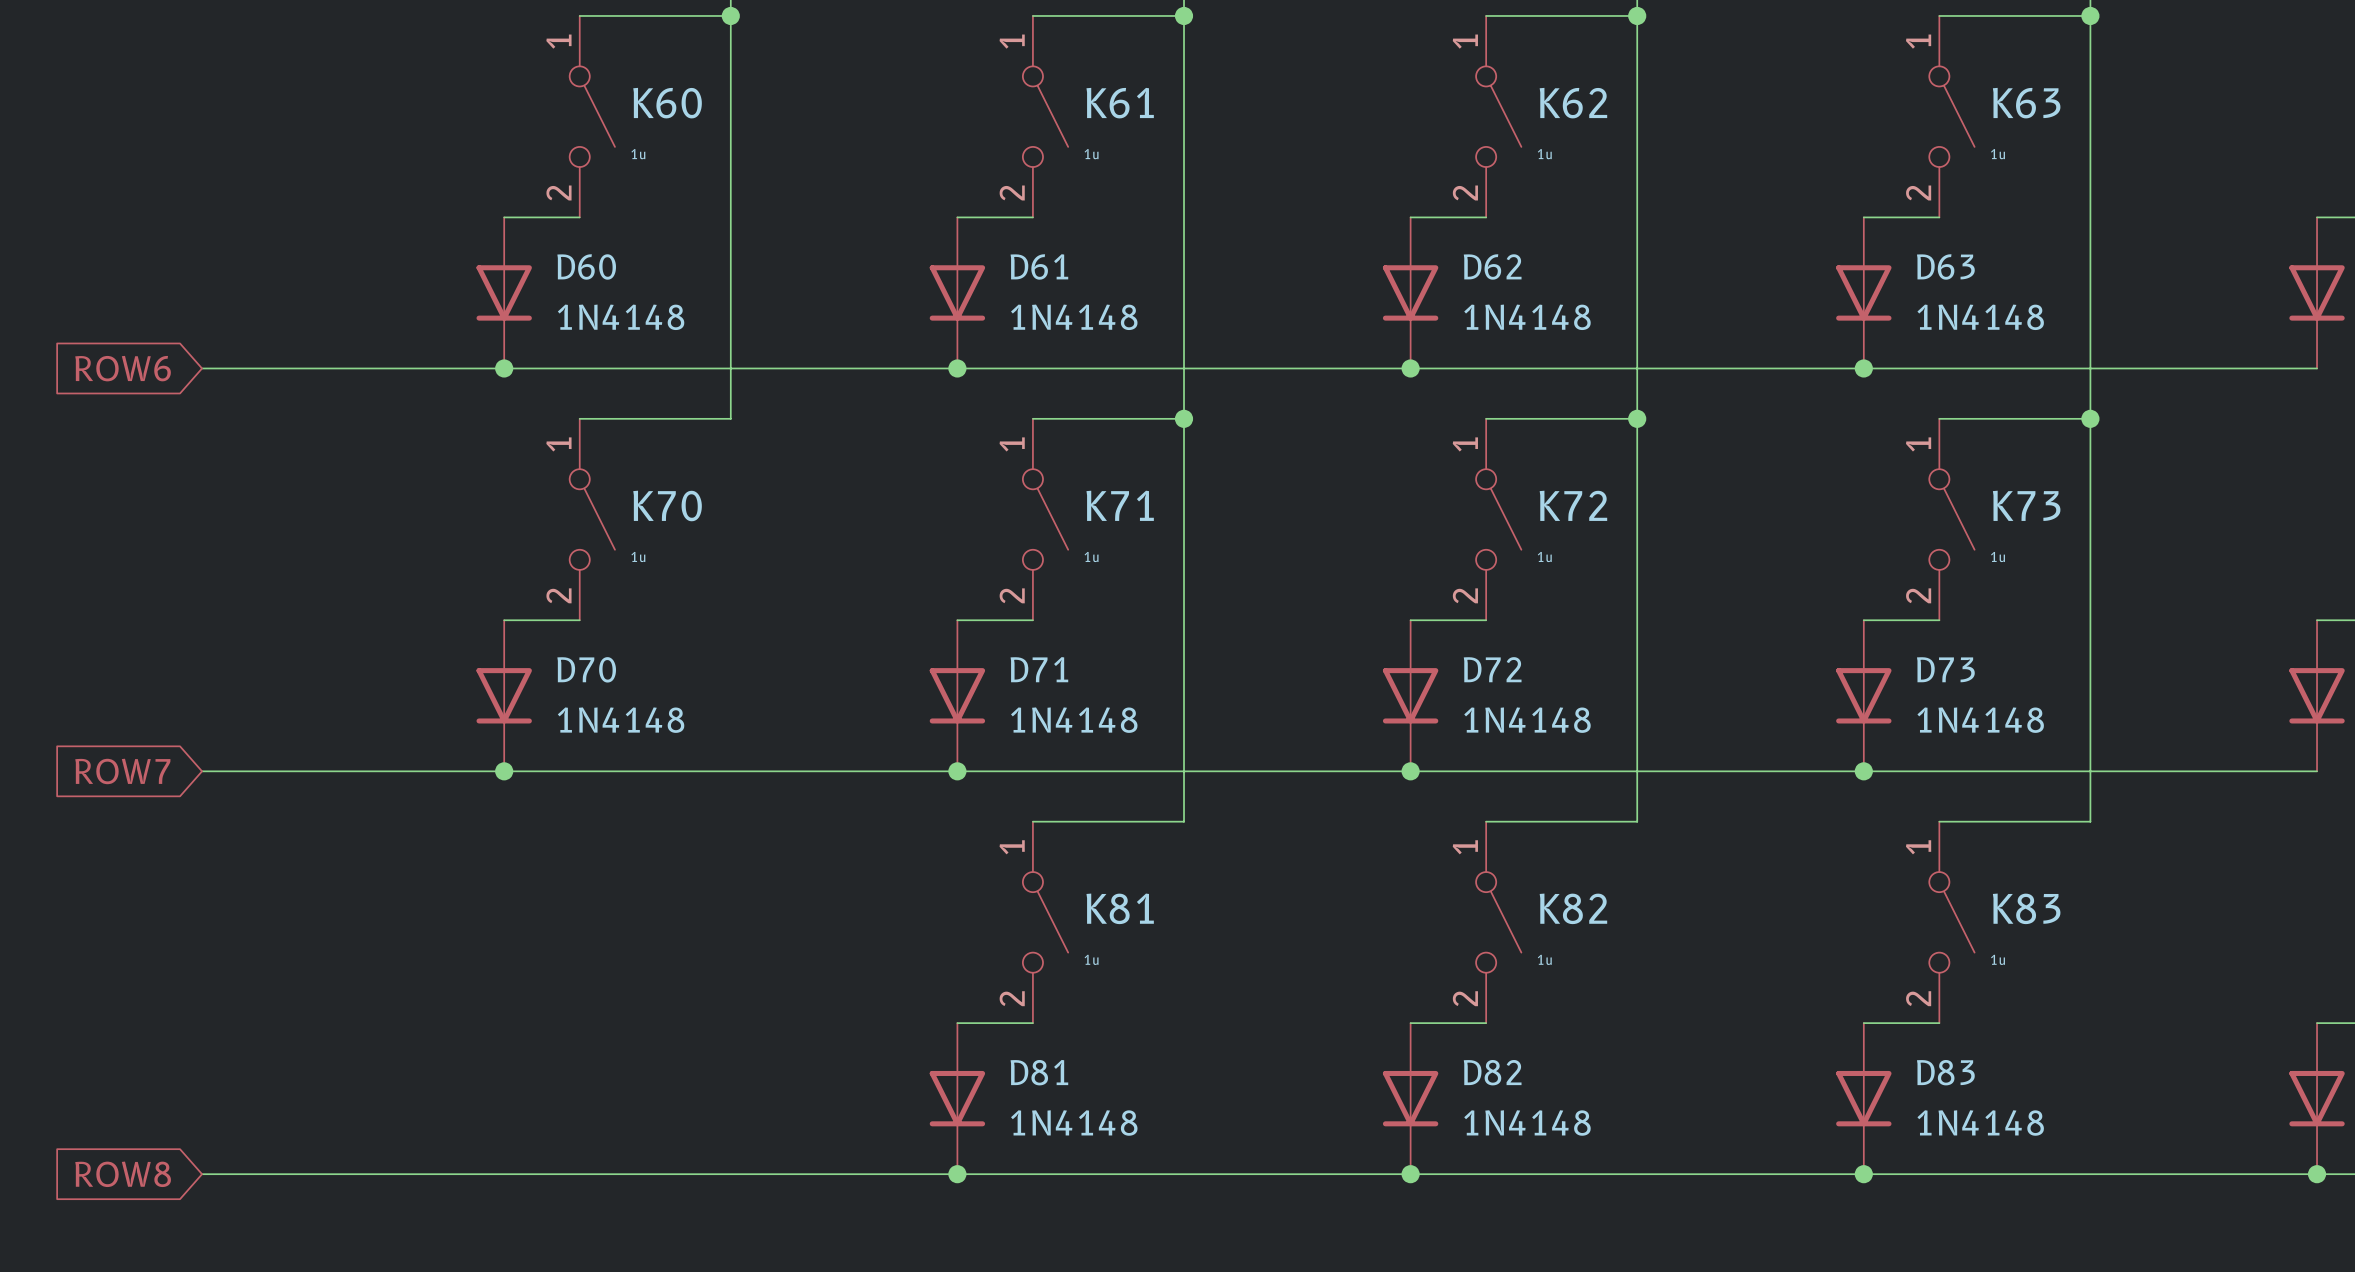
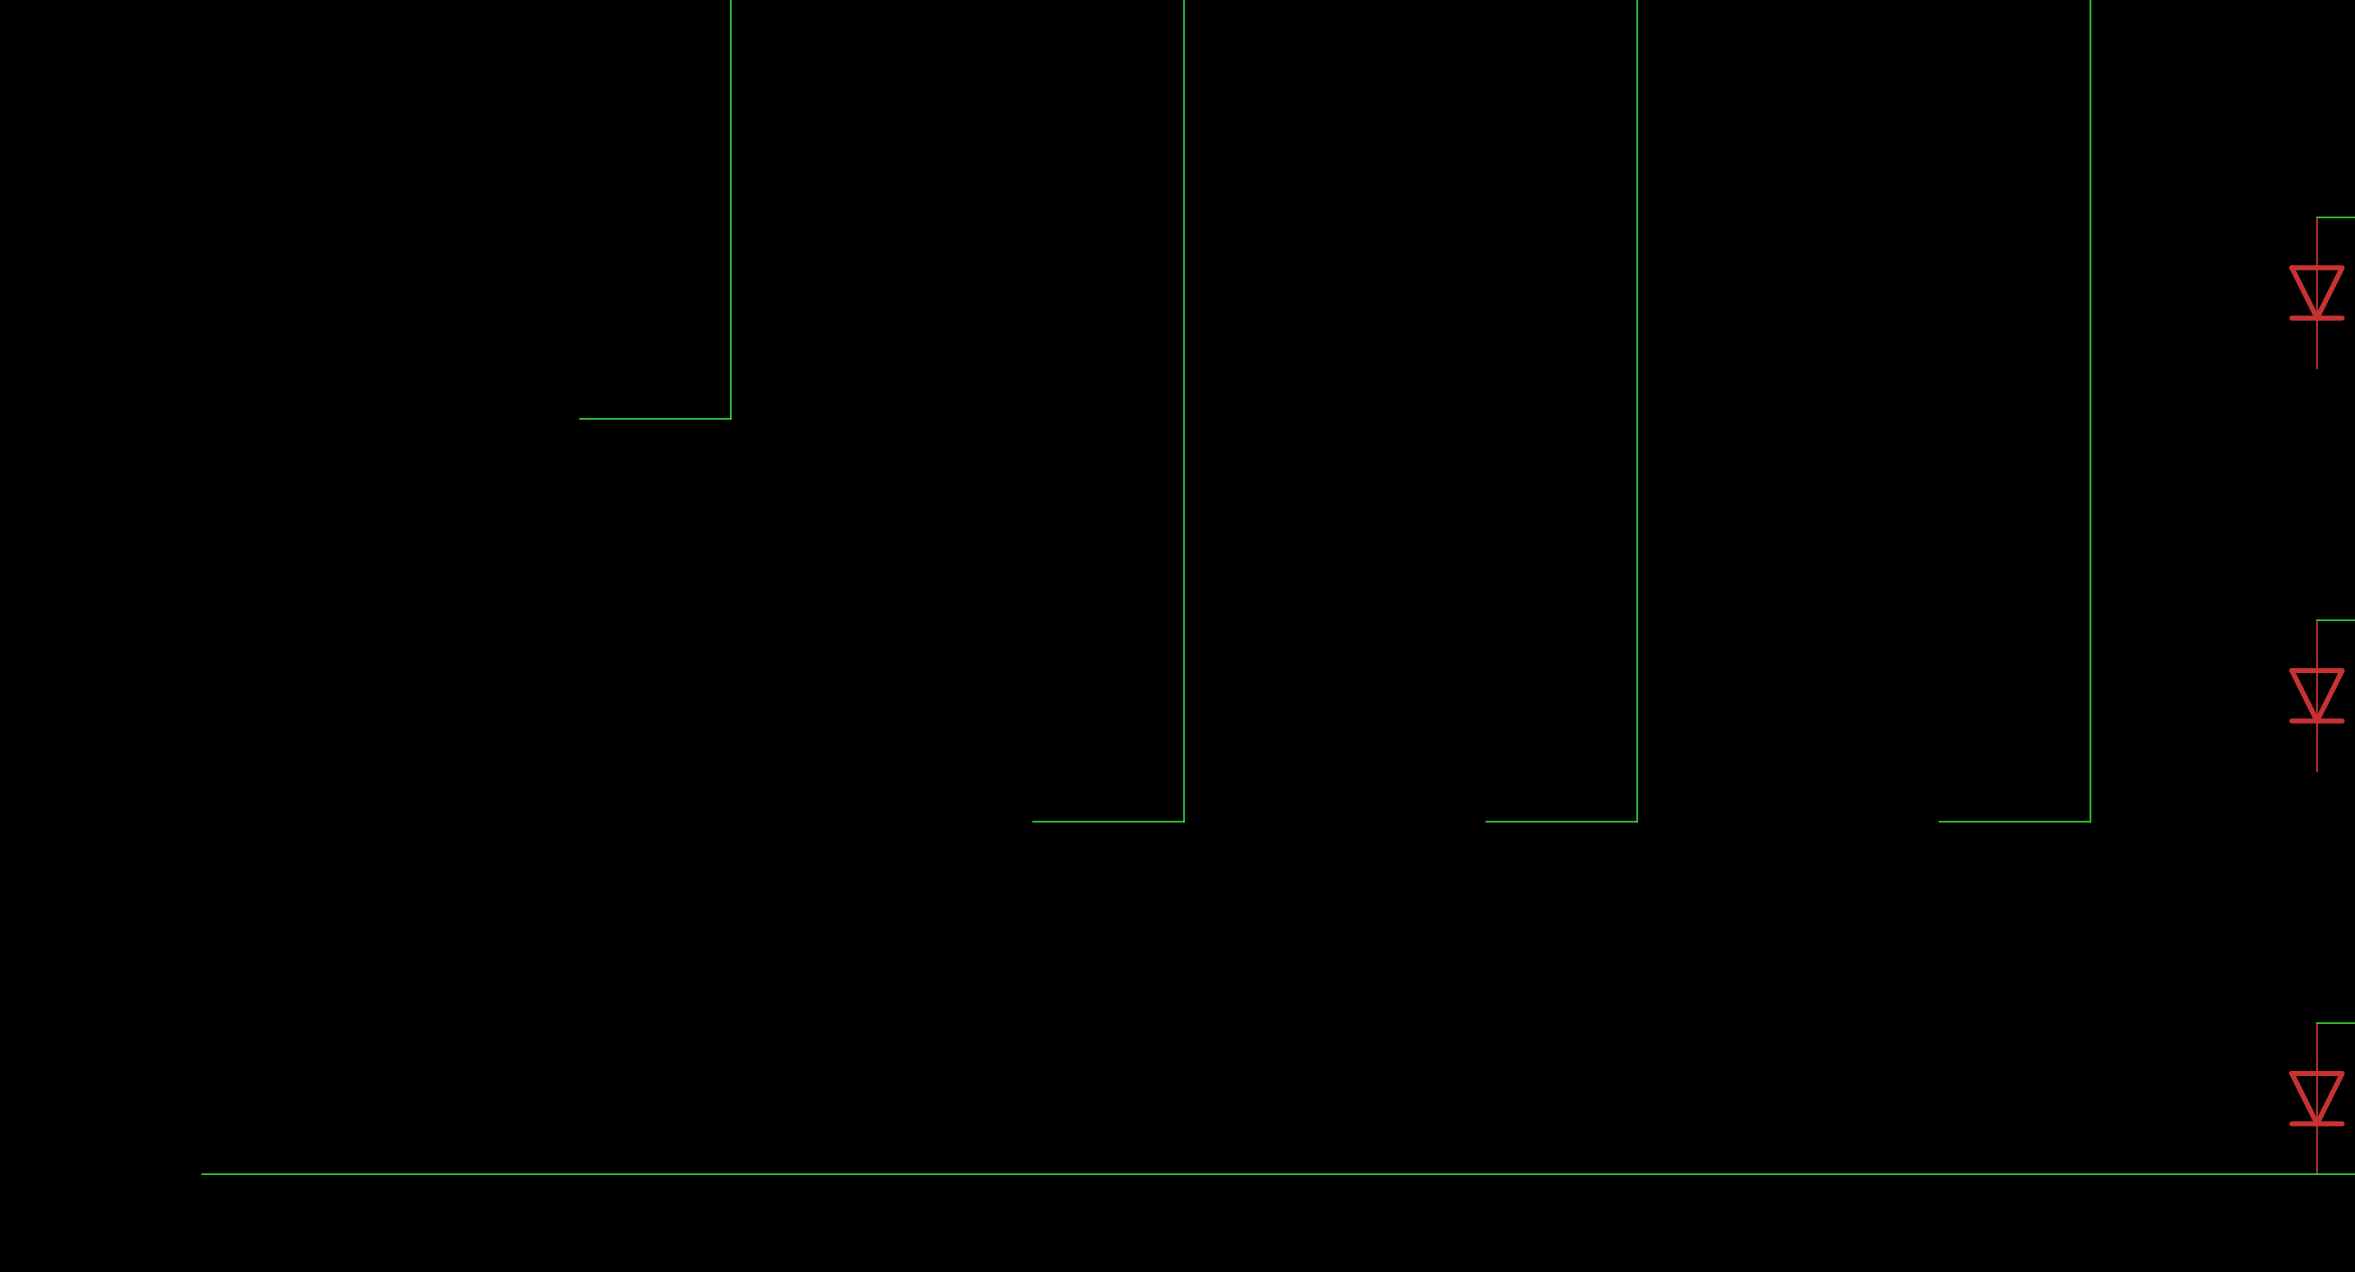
wire: (579, 15) (730, 15) -> none
junction: (730, 15) -> none
wire: (1032, 15) (1184, 15) -> none
junction: (1184, 15) -> none
wire: (1486, 15) (1637, 15) -> none
junction: (1637, 15) -> none
wire: (1939, 15) (2090, 15) -> none
junction: (2090, 15) -> none
K60: 1u (592, 116) -> none
K61: 1u (1045, 116) -> none
K62: 1u (1498, 116) -> none
K63: 1u (1951, 116) -> none
wire: (504, 217) (579, 217) -> none
wire: (957, 217) (1032, 217) -> none
wire: (1410, 217) (1486, 217) -> none
wire: (1863, 217) (1939, 217) -> none
D60: 1N4148 (504, 292) -> none
D61: 1N4148 (957, 292) -> none
D62: 1N4148 (1410, 292) -> none
D63: 1N4148 (1863, 292) -> none
global label: ROW6 (123, 368) -> none
wire: (202, 368) (2317, 368) -> none
junction: (504, 368) -> none
junction: (957, 368) -> none
junction: (1410, 368) -> none
junction: (1863, 368) -> none
wire: (1032, 418) (1184, 418) -> none
junction: (1184, 418) -> none
wire: (1486, 418) (1637, 418) -> none
junction: (1637, 418) -> none
wire: (1939, 418) (2090, 418) -> none
junction: (2090, 418) -> none
K70: 1u (592, 519) -> none
K71: 1u (1045, 519) -> none
K72: 1u (1498, 519) -> none
K73: 1u (1951, 519) -> none
wire: (504, 620) (579, 620) -> none
wire: (957, 620) (1032, 620) -> none
wire: (1410, 620) (1486, 620) -> none
wire: (1863, 620) (1939, 620) -> none
D70: 1N4148 (504, 695) -> none
D71: 1N4148 (957, 695) -> none
D72: 1N4148 (1410, 695) -> none
D73: 1N4148 (1863, 695) -> none
global label: ROW7 (122, 771) -> none
wire: (202, 771) (2317, 771) -> none
junction: (504, 771) -> none
junction: (957, 771) -> none
junction: (1410, 771) -> none
junction: (1863, 771) -> none
K81: 1u (1045, 922) -> none
K82: 1u (1498, 922) -> none
K83: 1u (1951, 922) -> none
wire: (957, 1023) (1032, 1023) -> none
wire: (1410, 1023) (1486, 1023) -> none
wire: (1863, 1023) (1939, 1023) -> none
D81: 1N4148 (957, 1098) -> none
D82: 1N4148 (1410, 1098) -> none
D83: 1N4148 (1863, 1098) -> none
global label: ROW8 (123, 1174) -> none
junction: (957, 1174) -> none
junction: (1410, 1174) -> none
junction: (1863, 1174) -> none
junction: (2317, 1174) -> none

